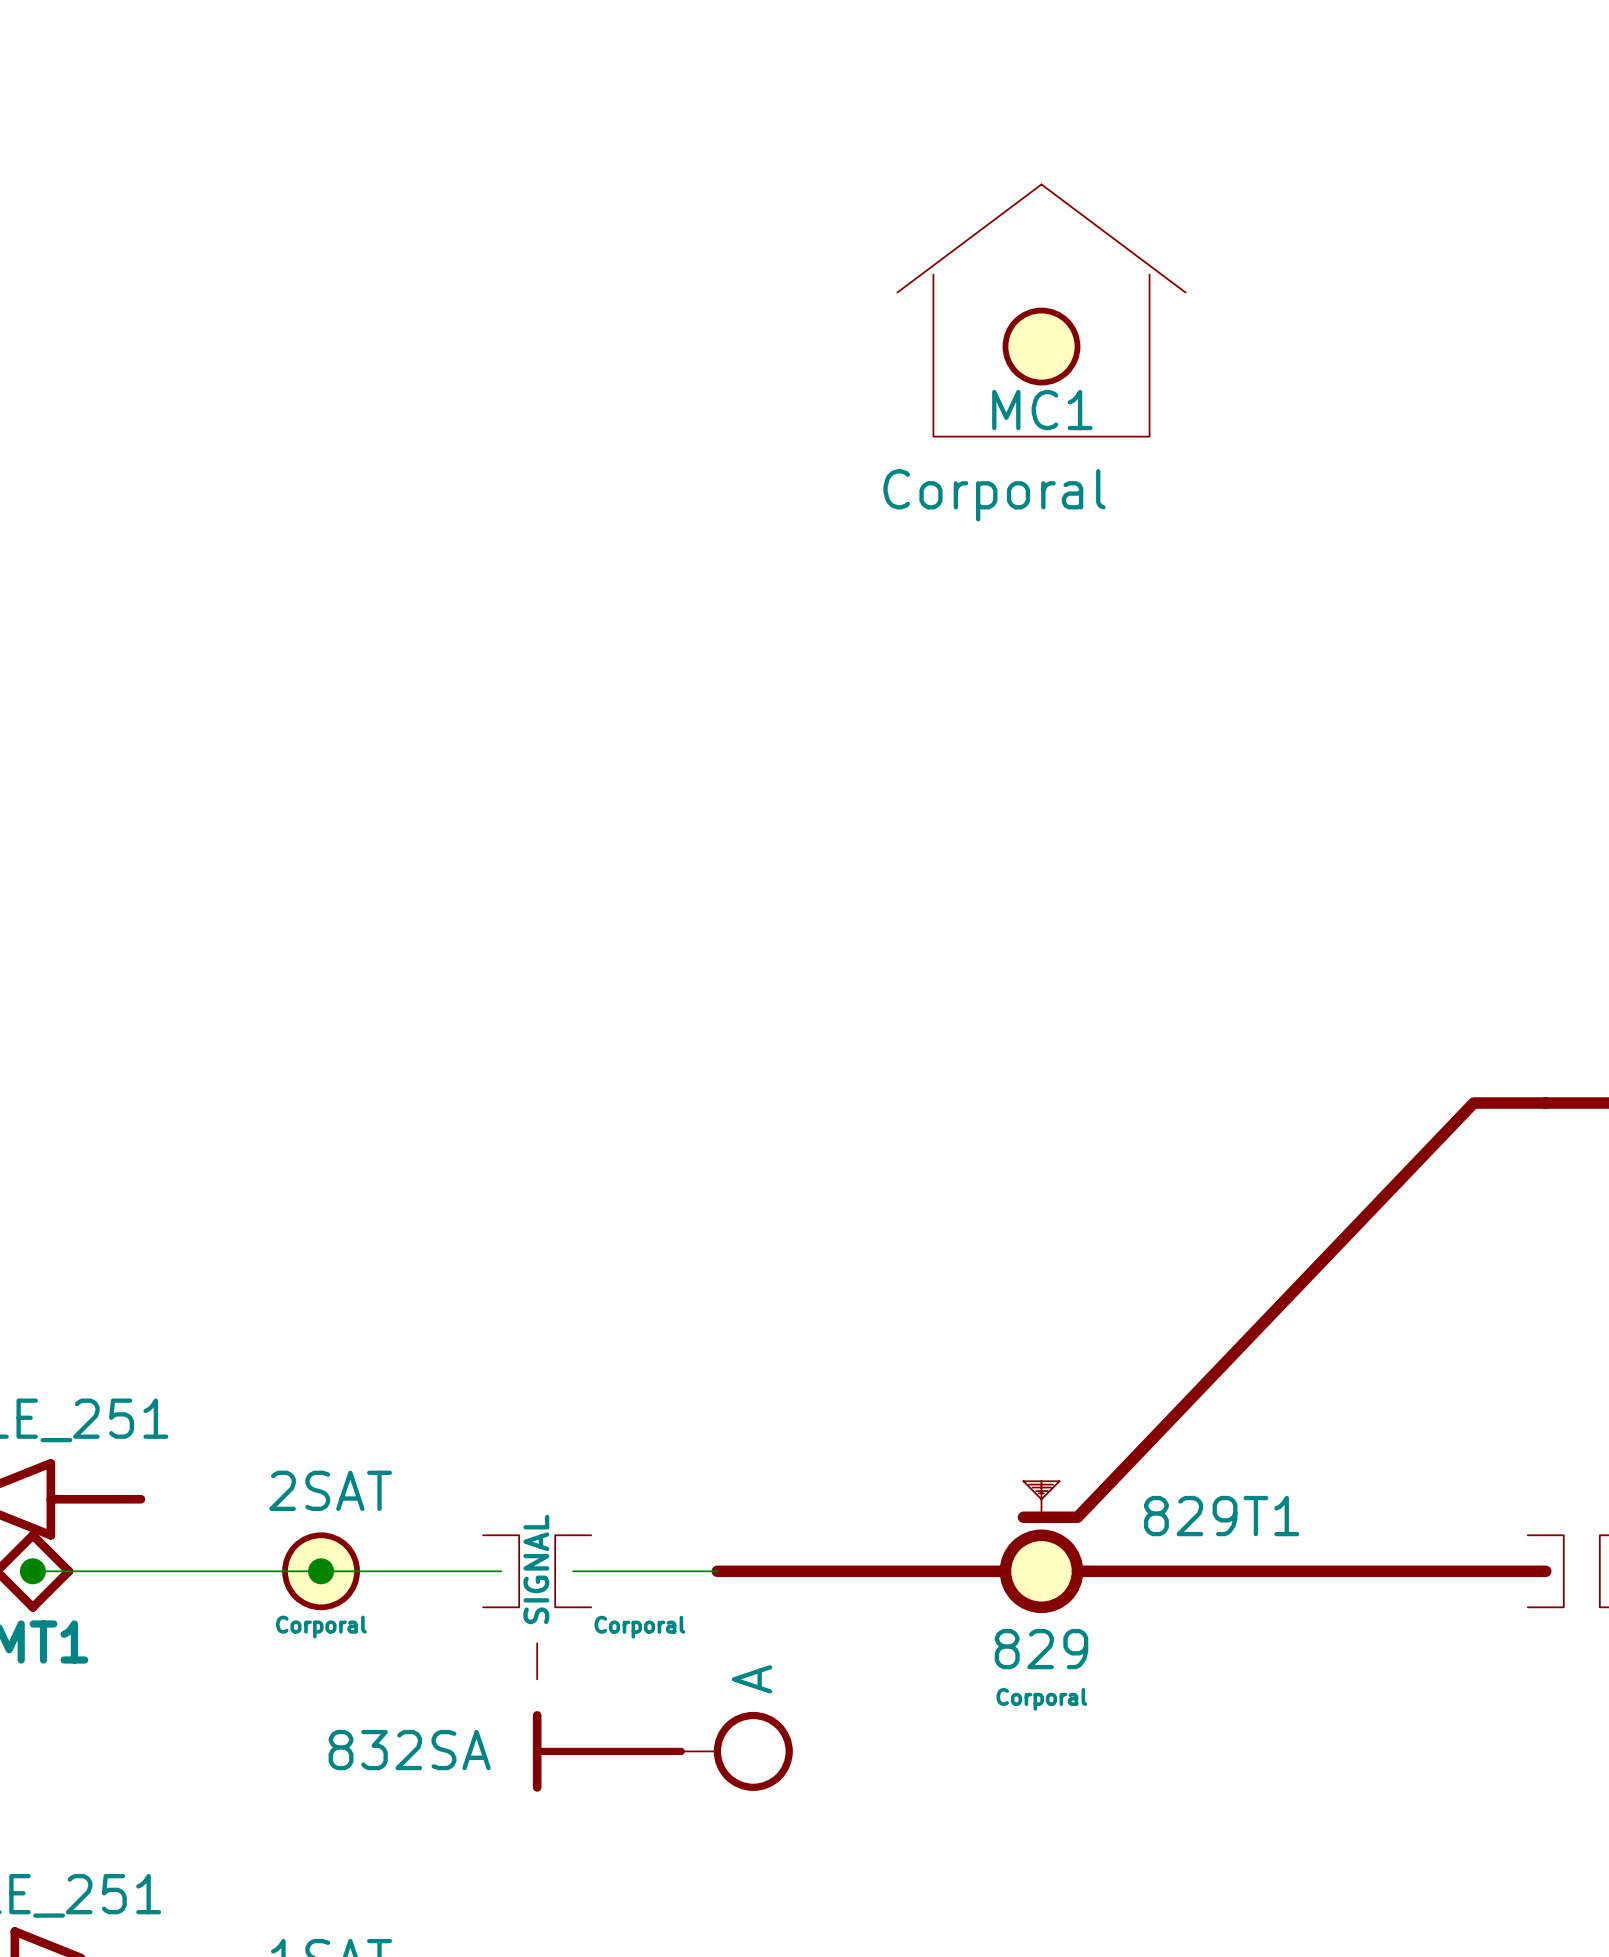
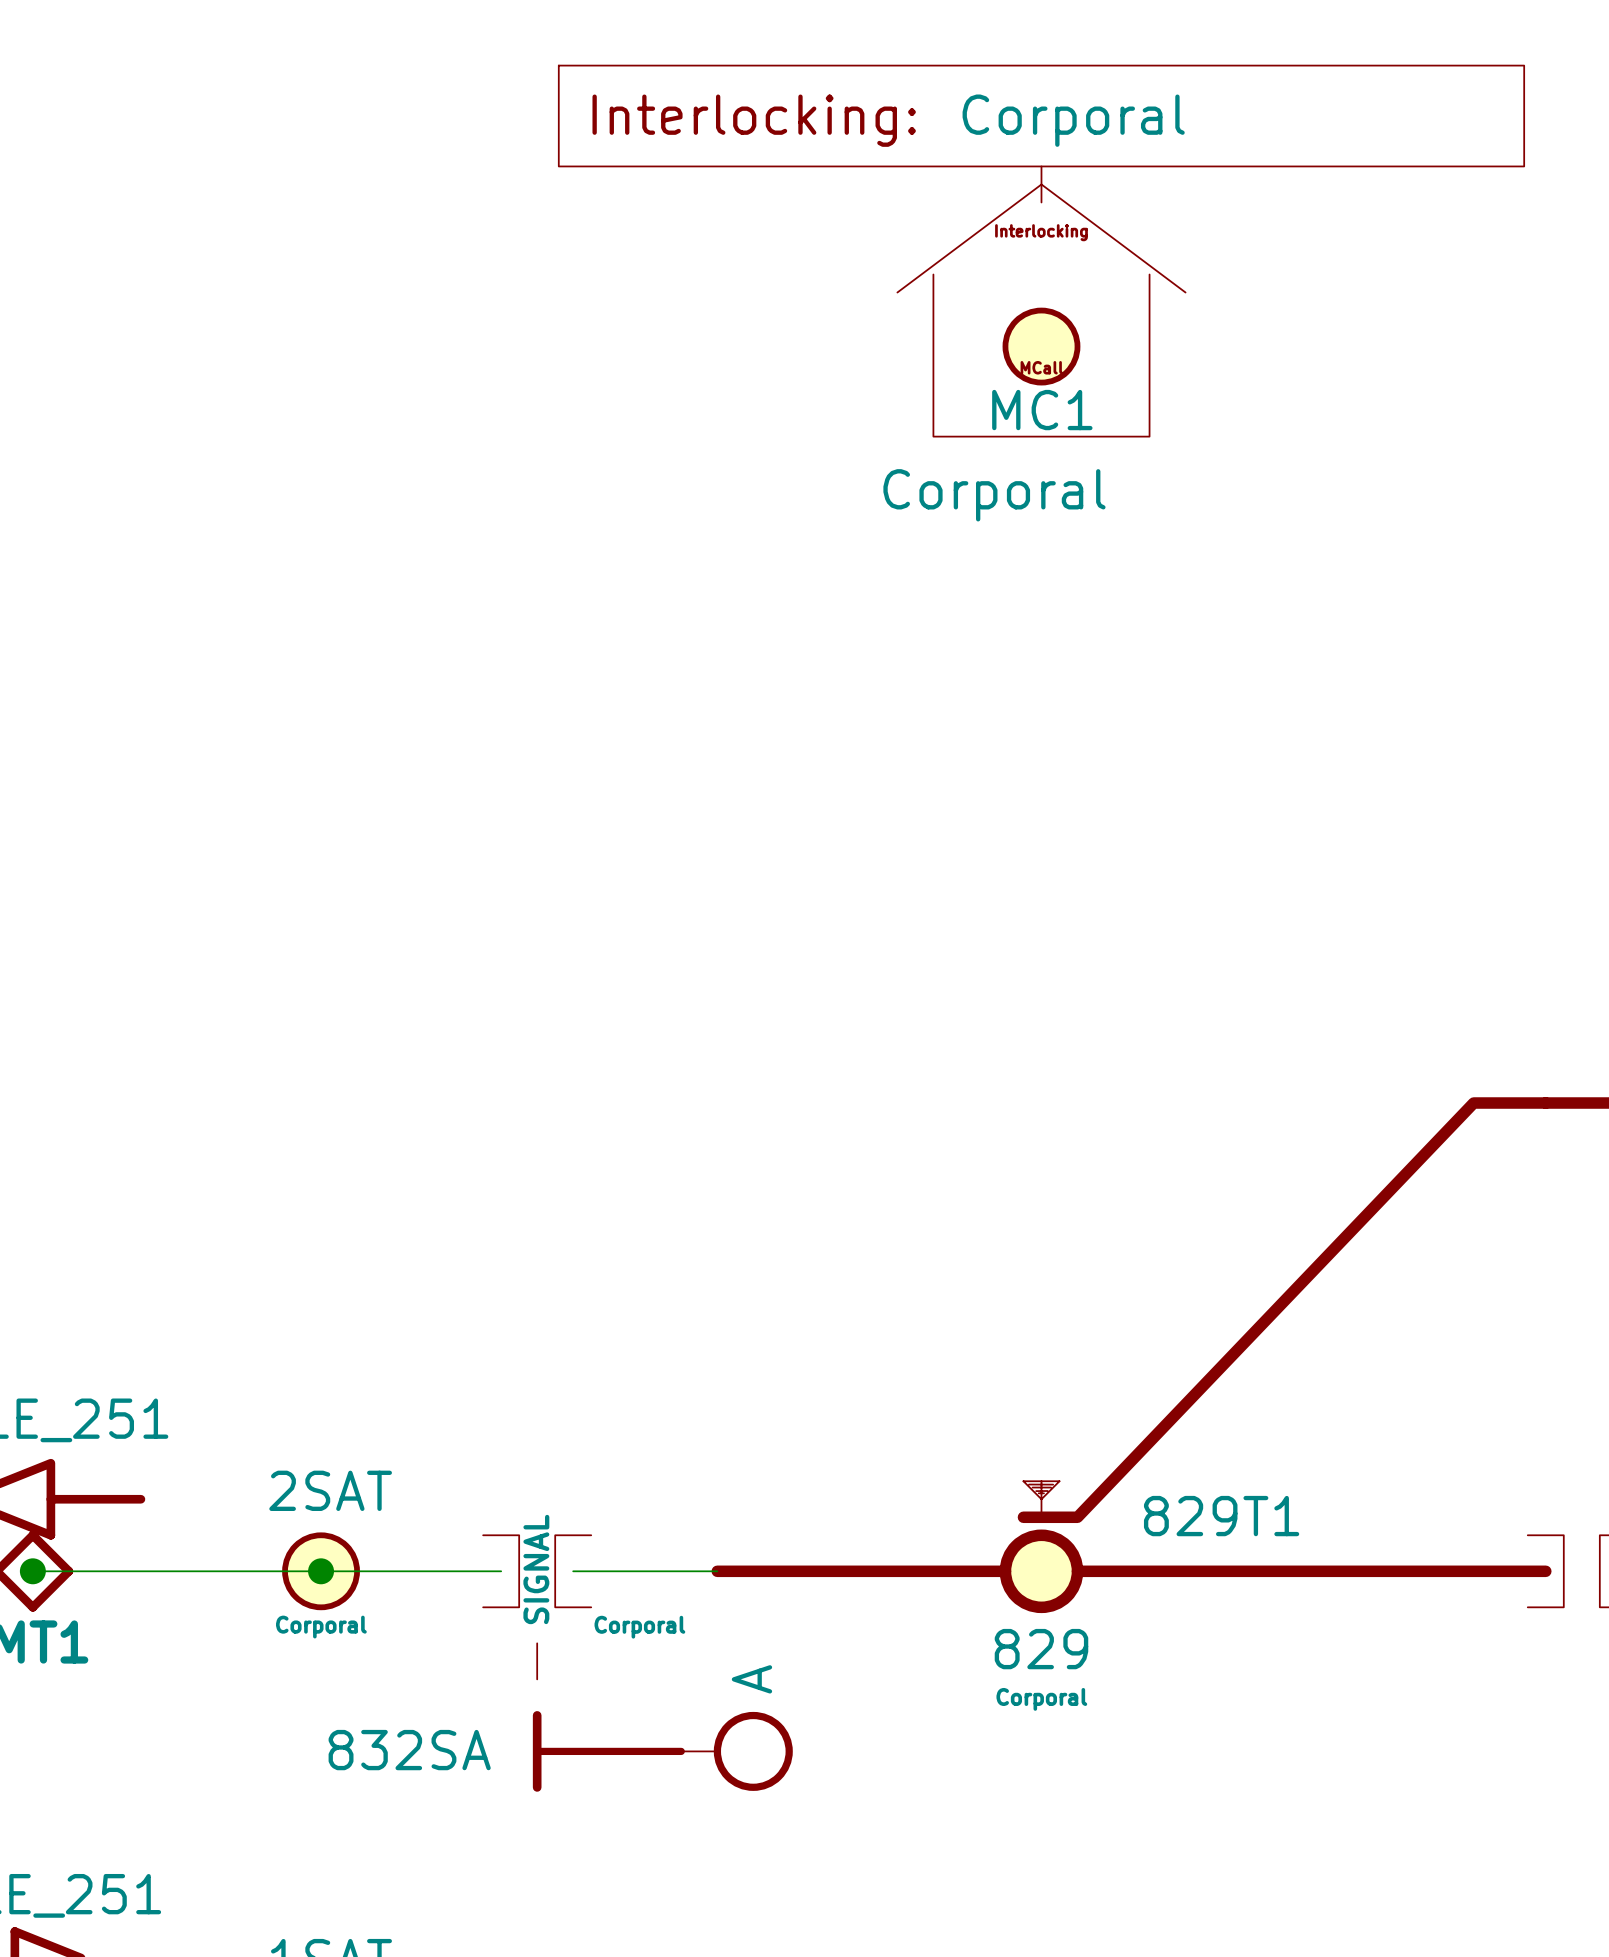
part: none -> Corporal (1041, 134)
part text: none -> Interlocking (1041, 232)
part text: none -> MCall (1041, 367)

